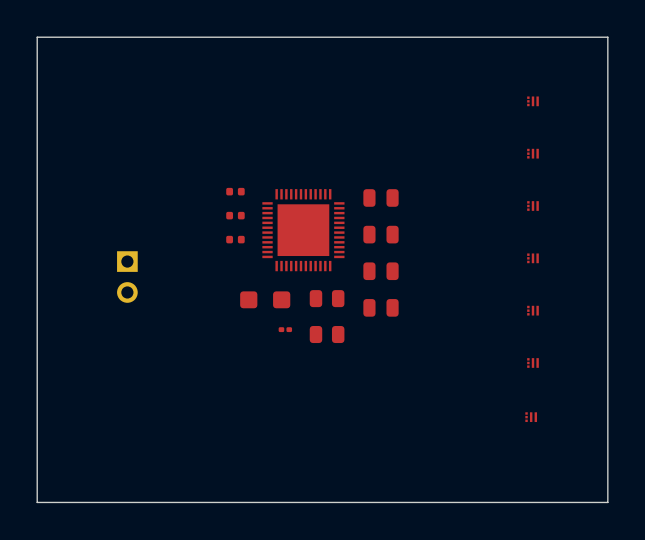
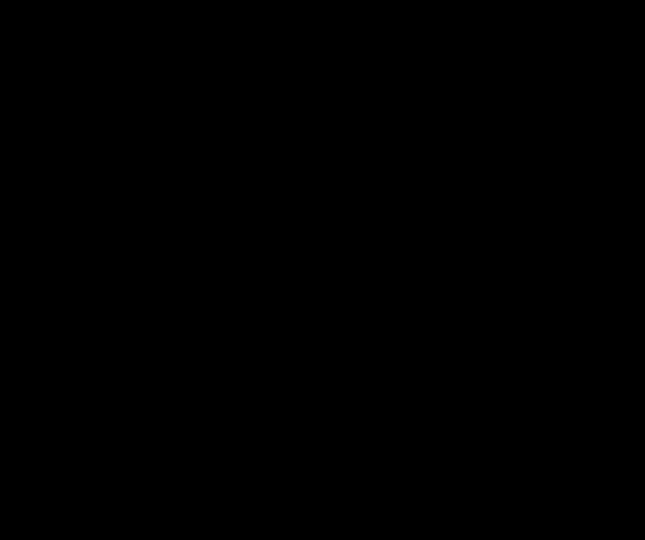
board edge: (607, 37) (37, 37) (37, 502) (607, 502) (607, 37) -> none
part: (533, 101) -> none
part: (533, 153) -> none
part: (235, 191) -> none
part: (381, 197) -> none
part: (533, 206) -> none
part: (235, 215) -> none
part: (303, 230) -> none
part: (381, 234) -> none
part: (235, 239) -> none
part: (533, 258) -> none
part: (381, 271) -> none
part: (127, 277) -> none
part: (327, 298) -> none
part: (265, 299) -> none
part: (381, 307) -> none
part: (533, 310) -> none
part: (285, 329) -> none
part: (327, 334) -> none
part: (533, 362) -> none
part: (531, 417) -> none

